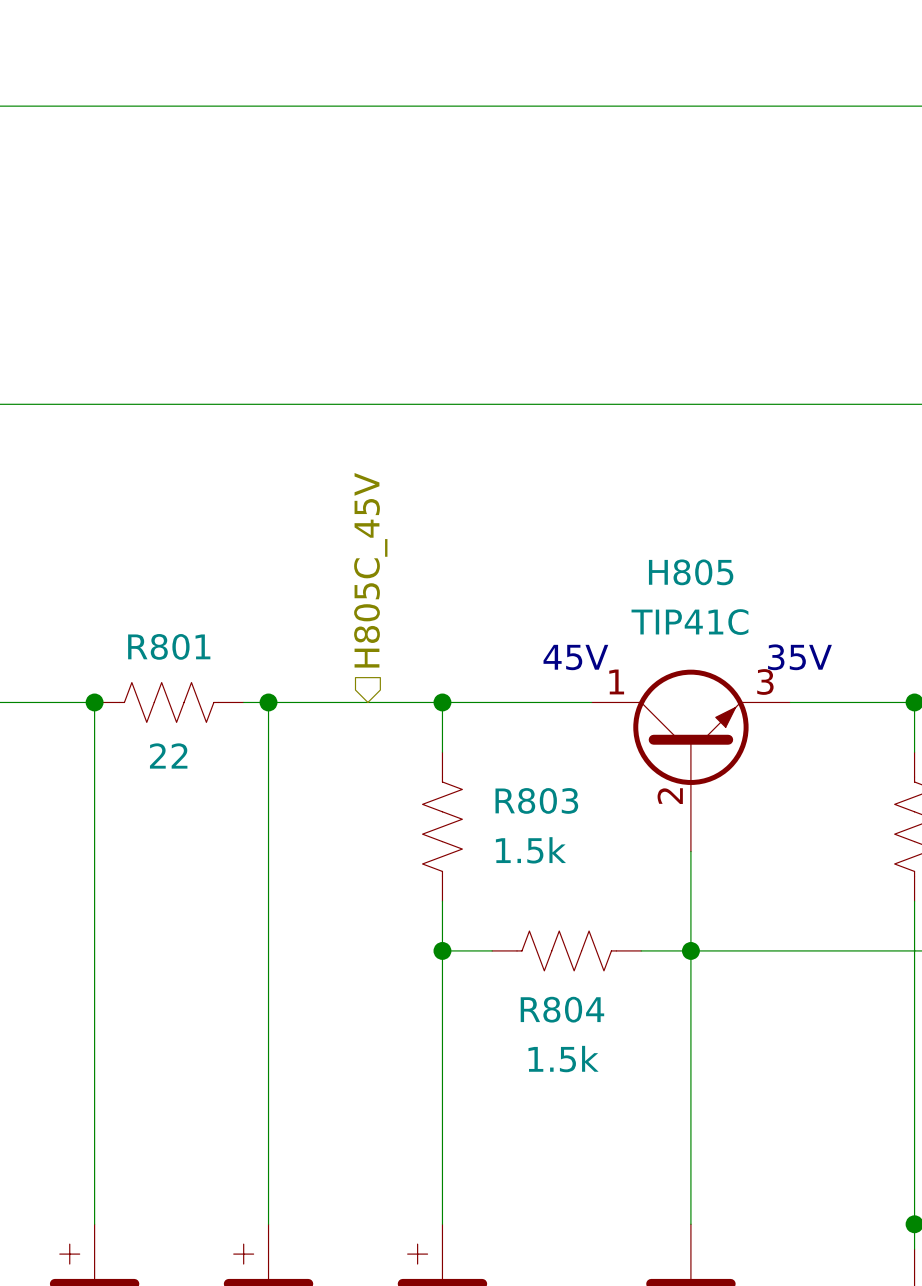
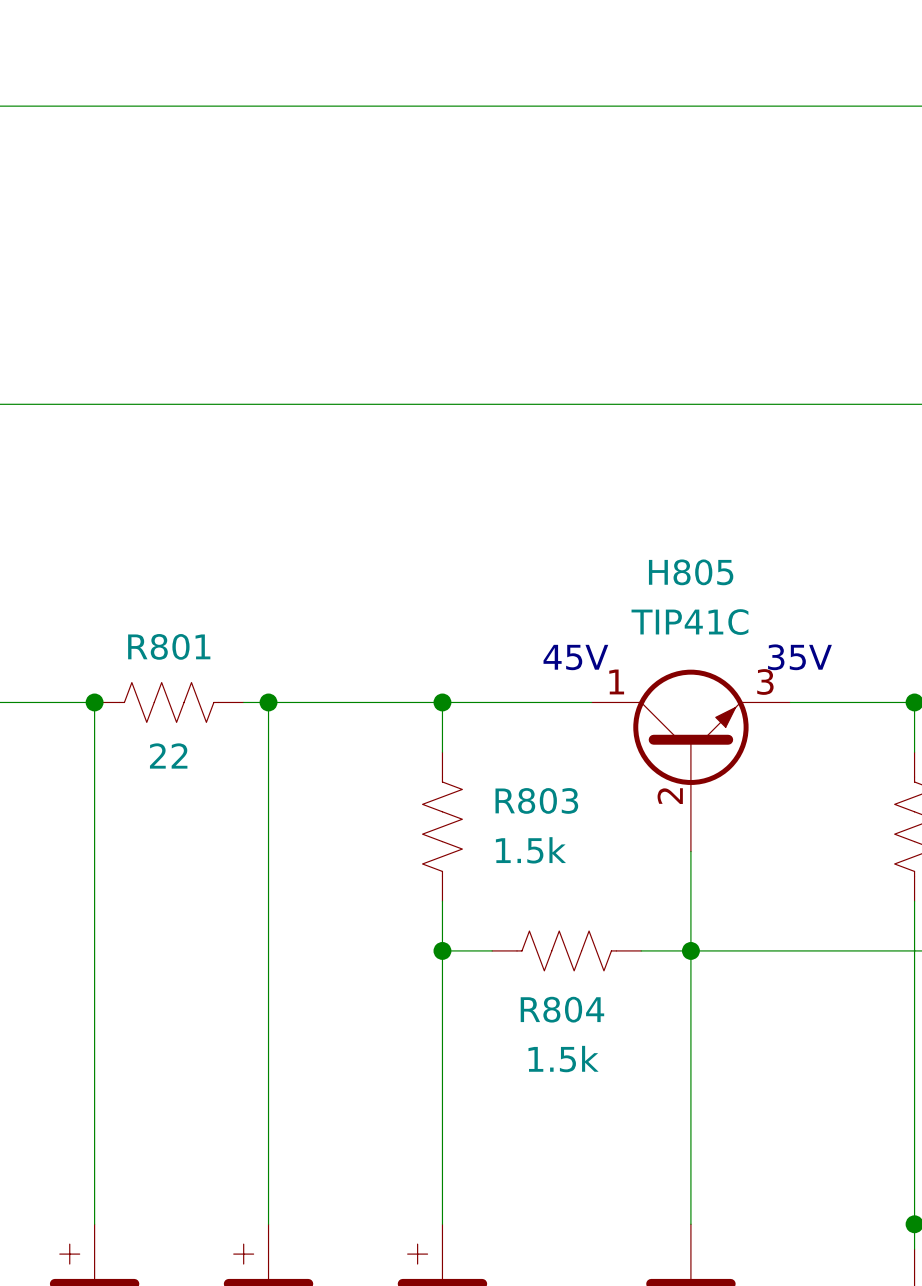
hierarchical label: H805C_45V (370, 570) -> none

